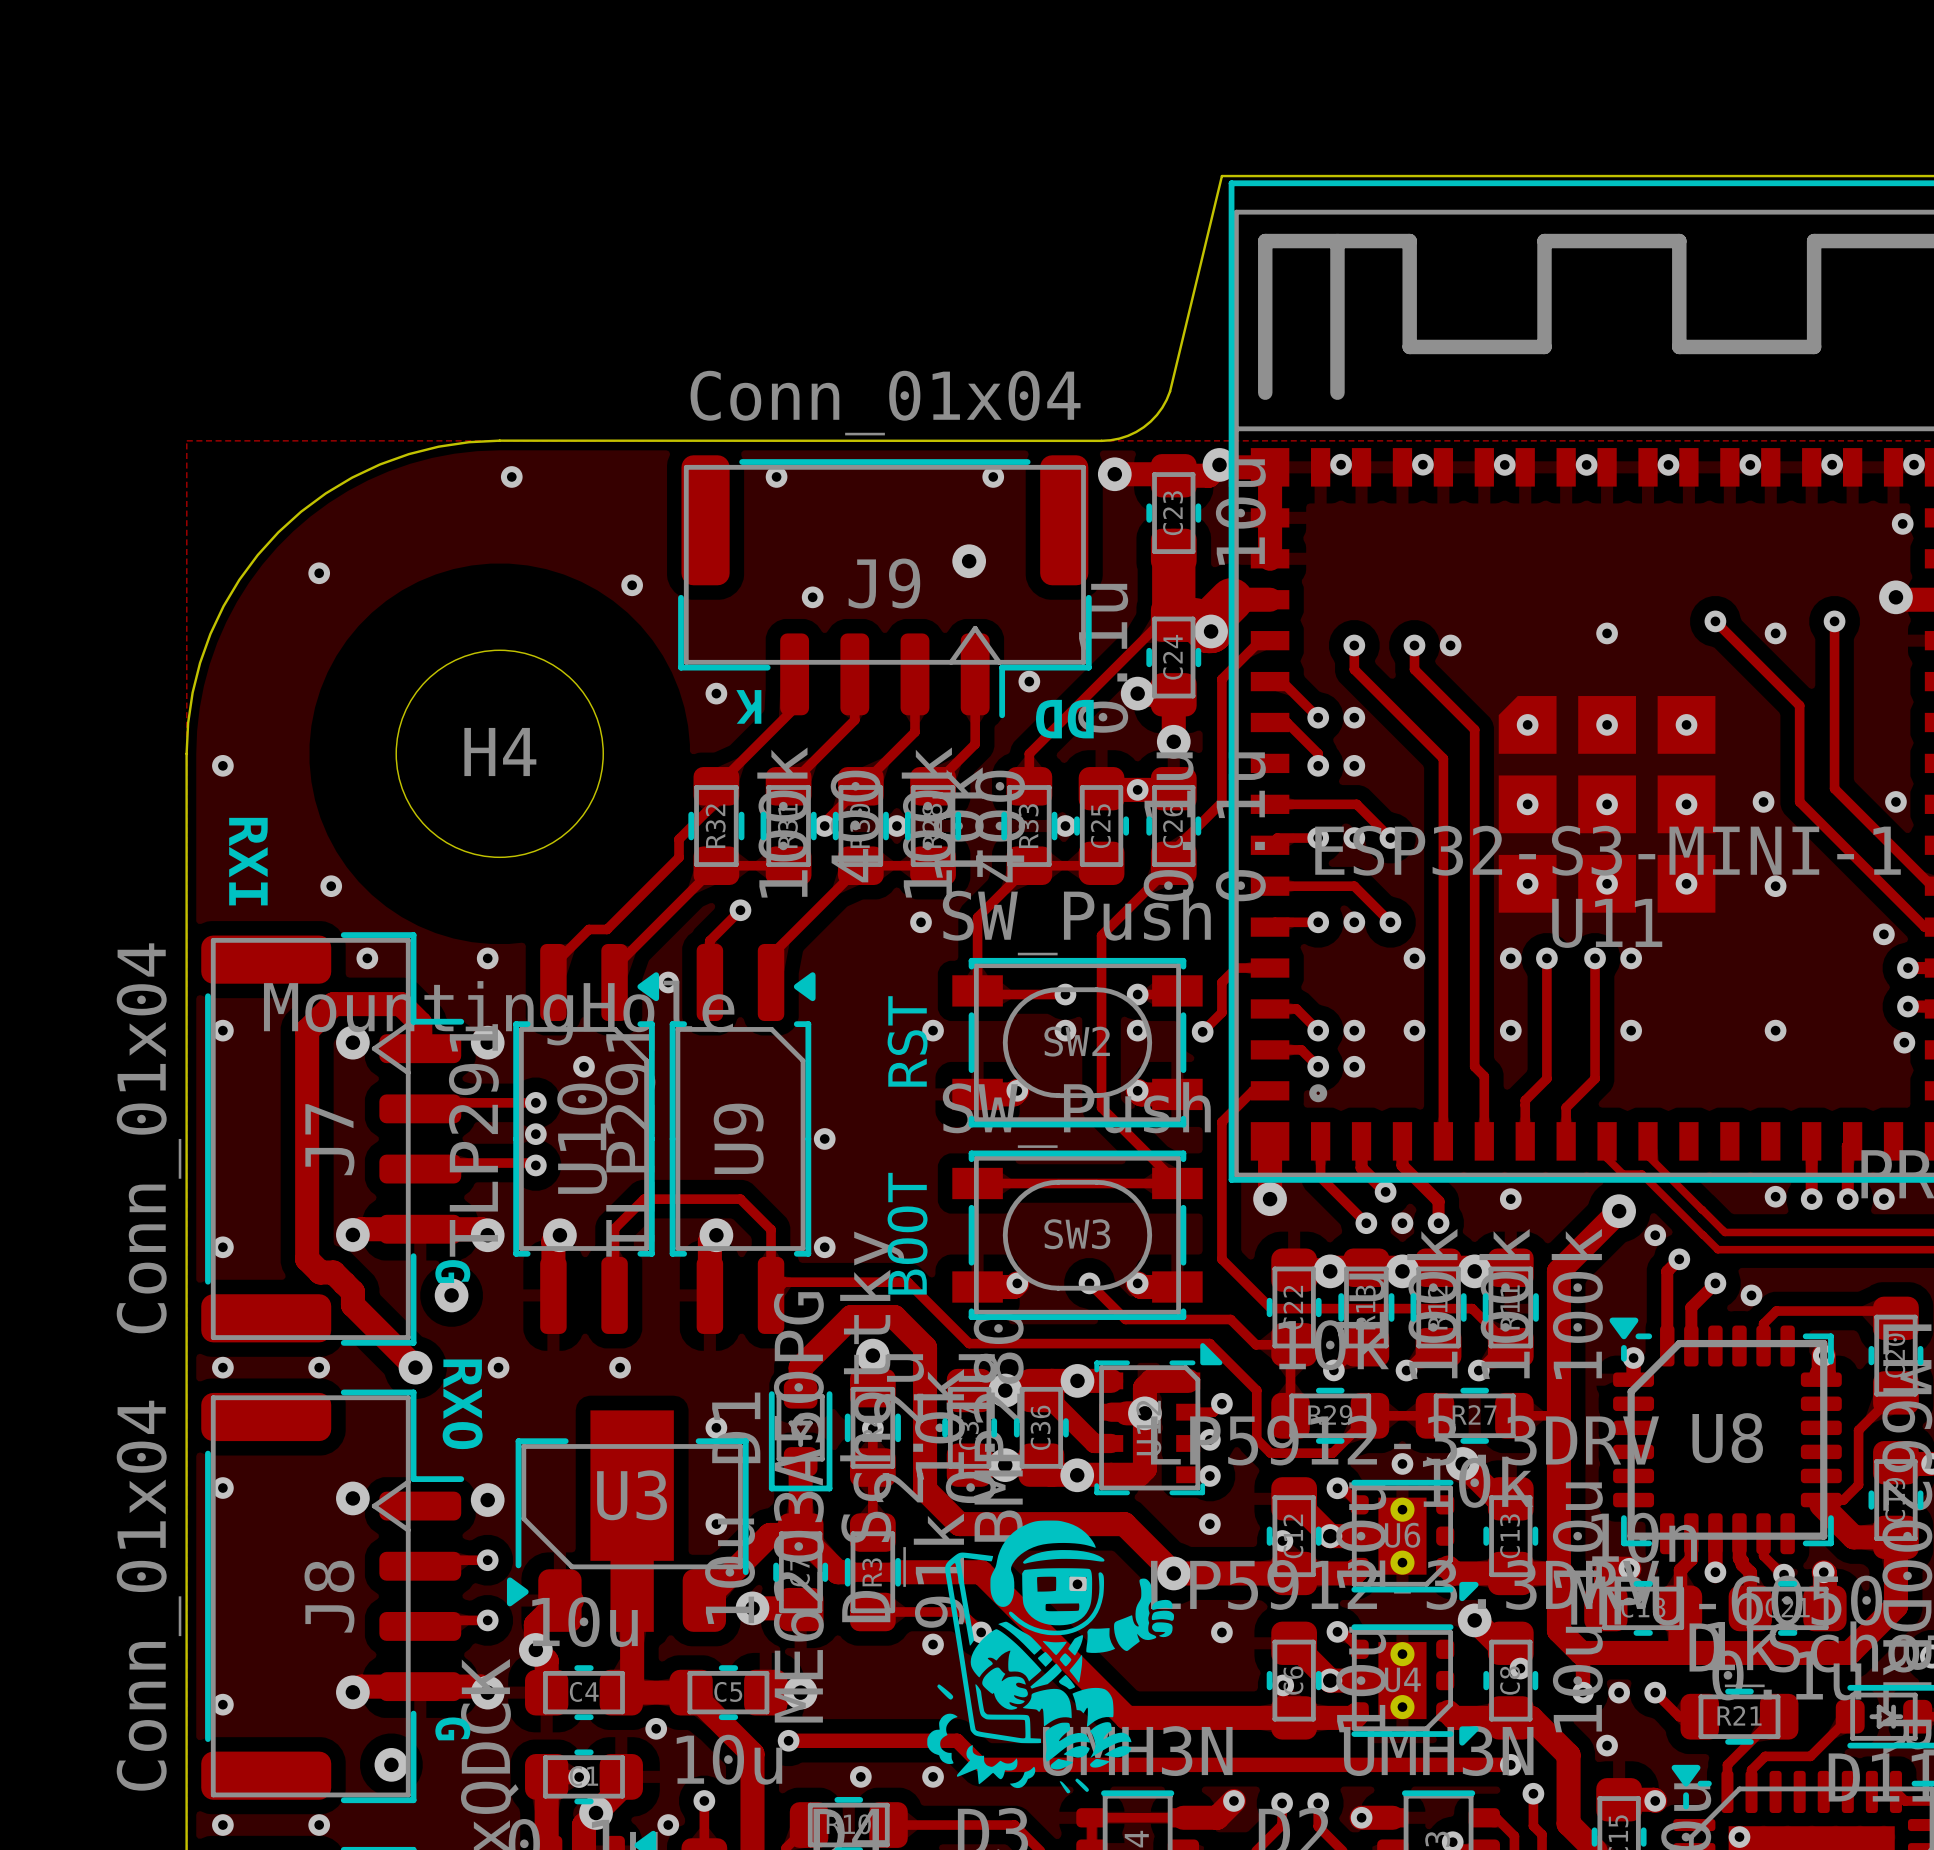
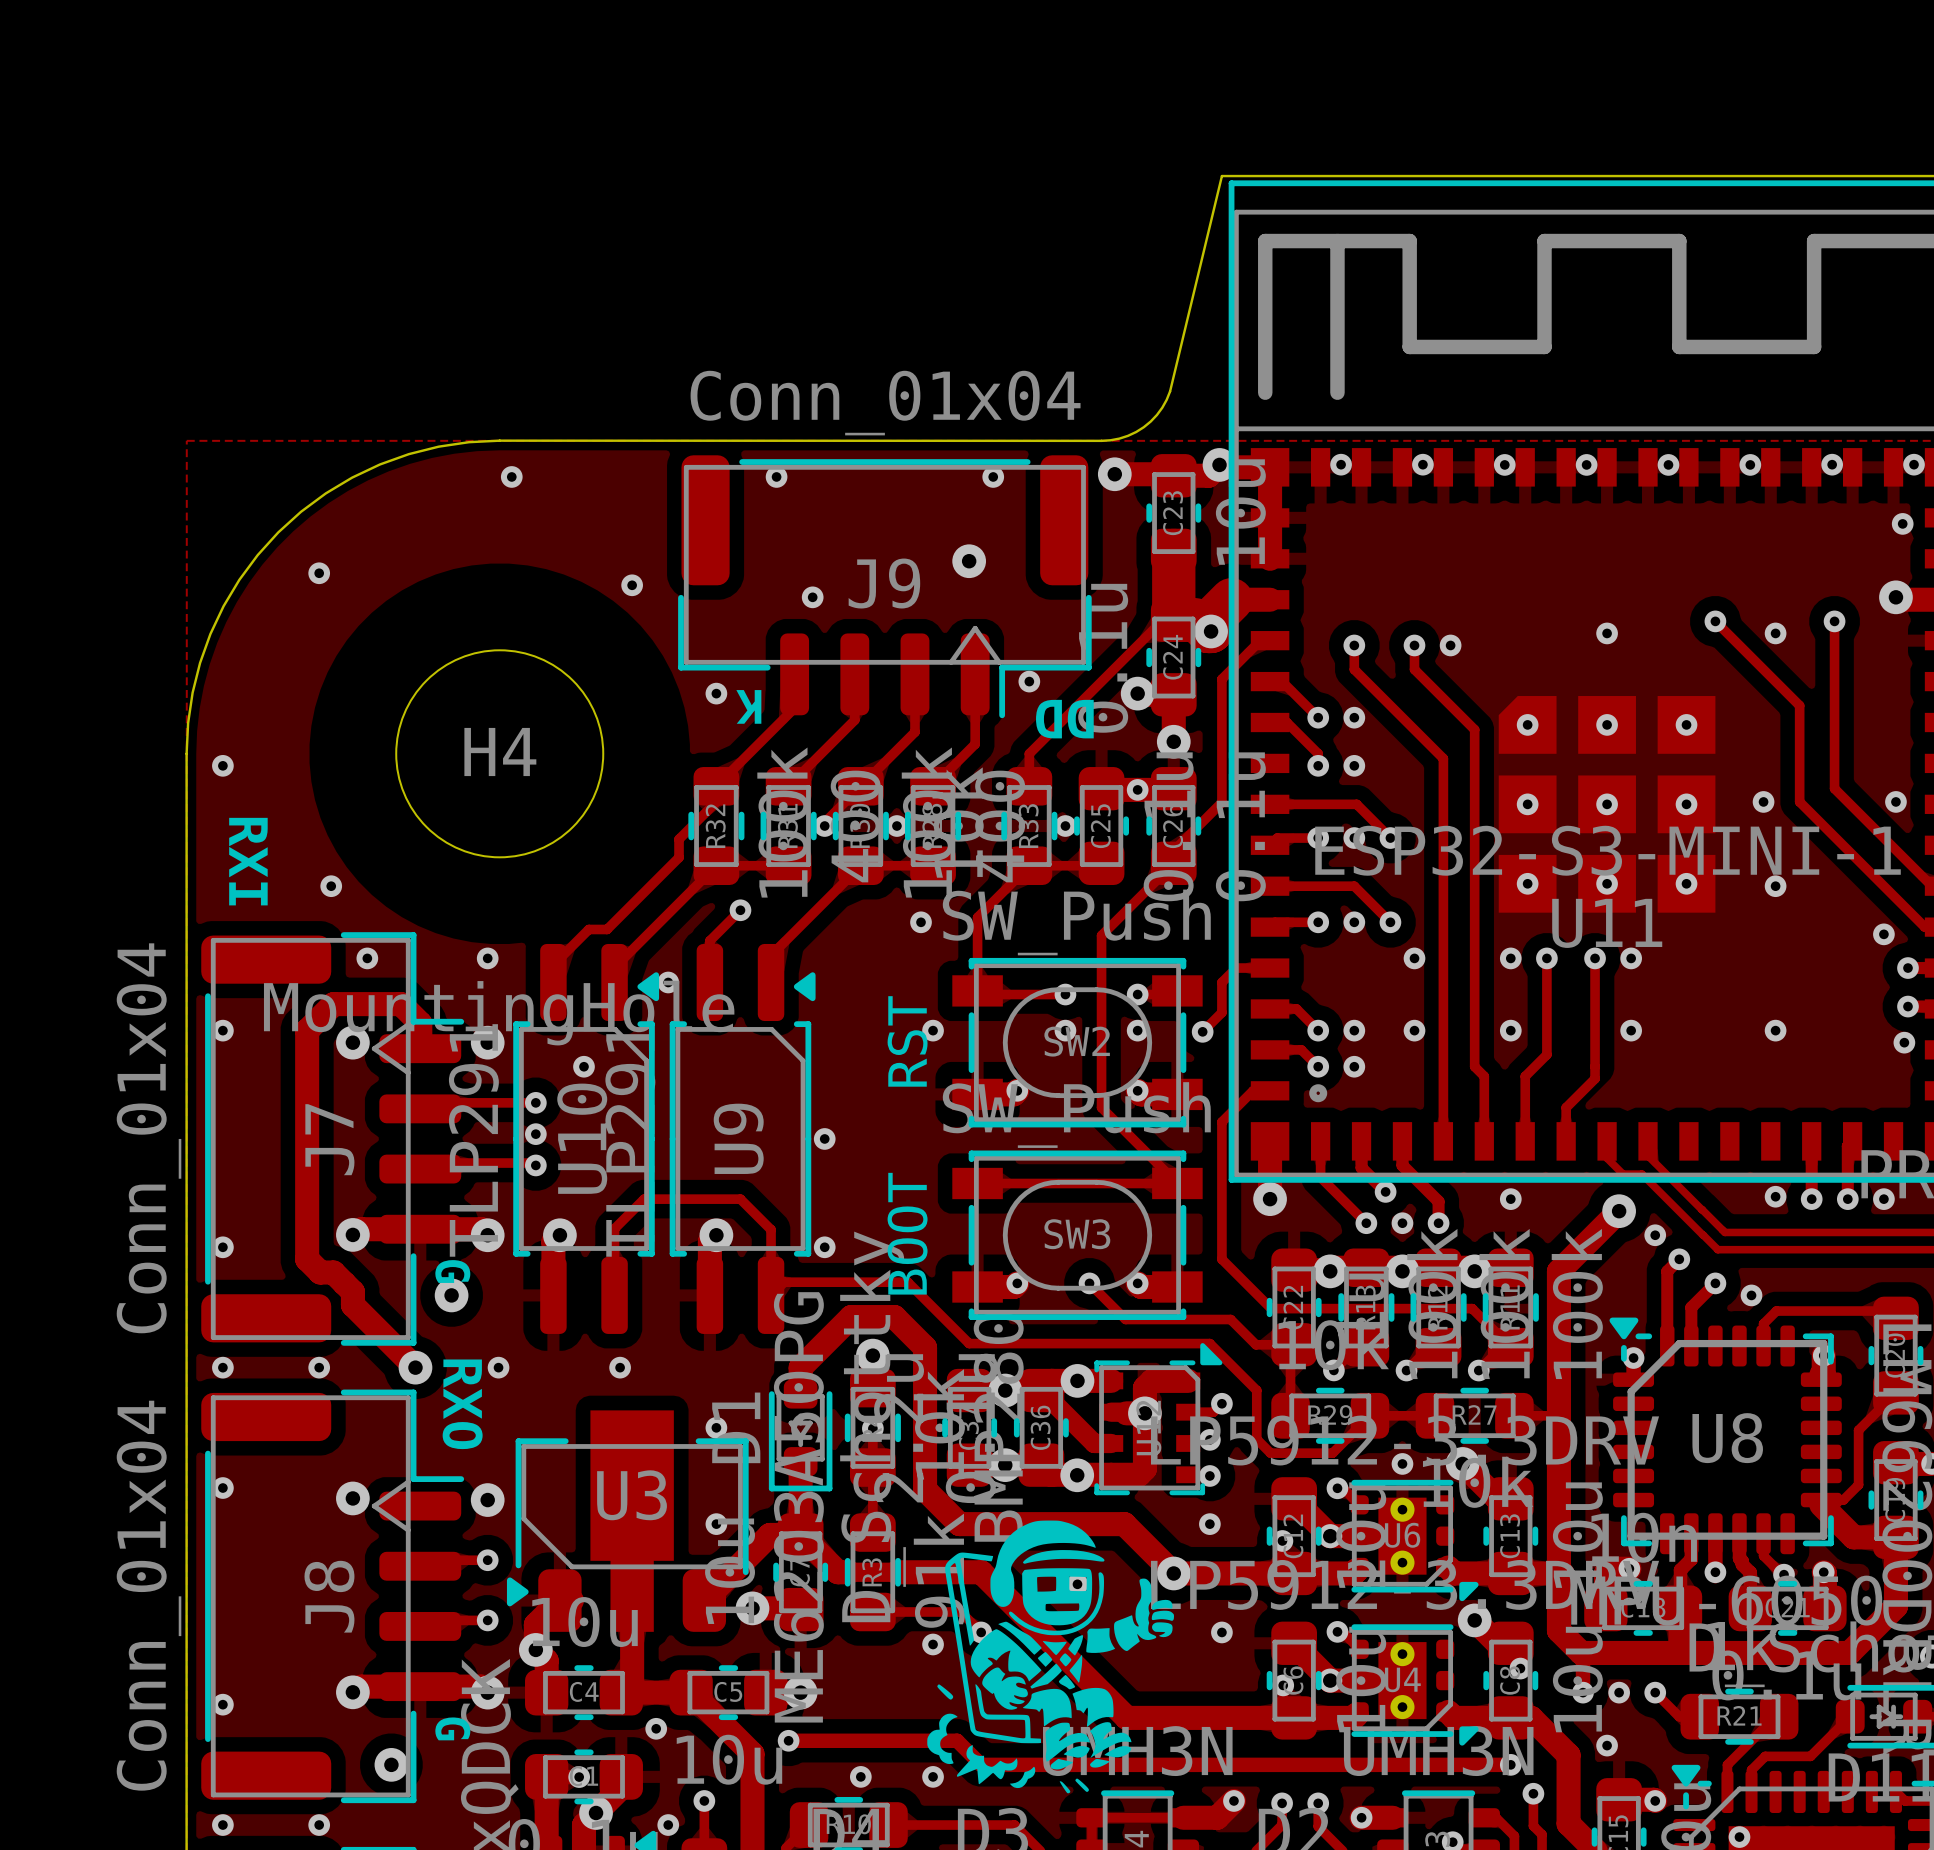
track: (1546, 1054) (1546, 1078) (1525, 1100) -> (1546, 1054) (1525, 1076) (1525, 1100)

